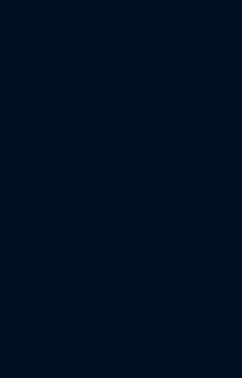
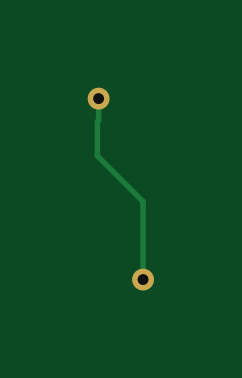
track: none -> (98, 98) (97, 155) (143, 201) (143, 279)
via: none -> (98, 98)
via: none -> (143, 279)

